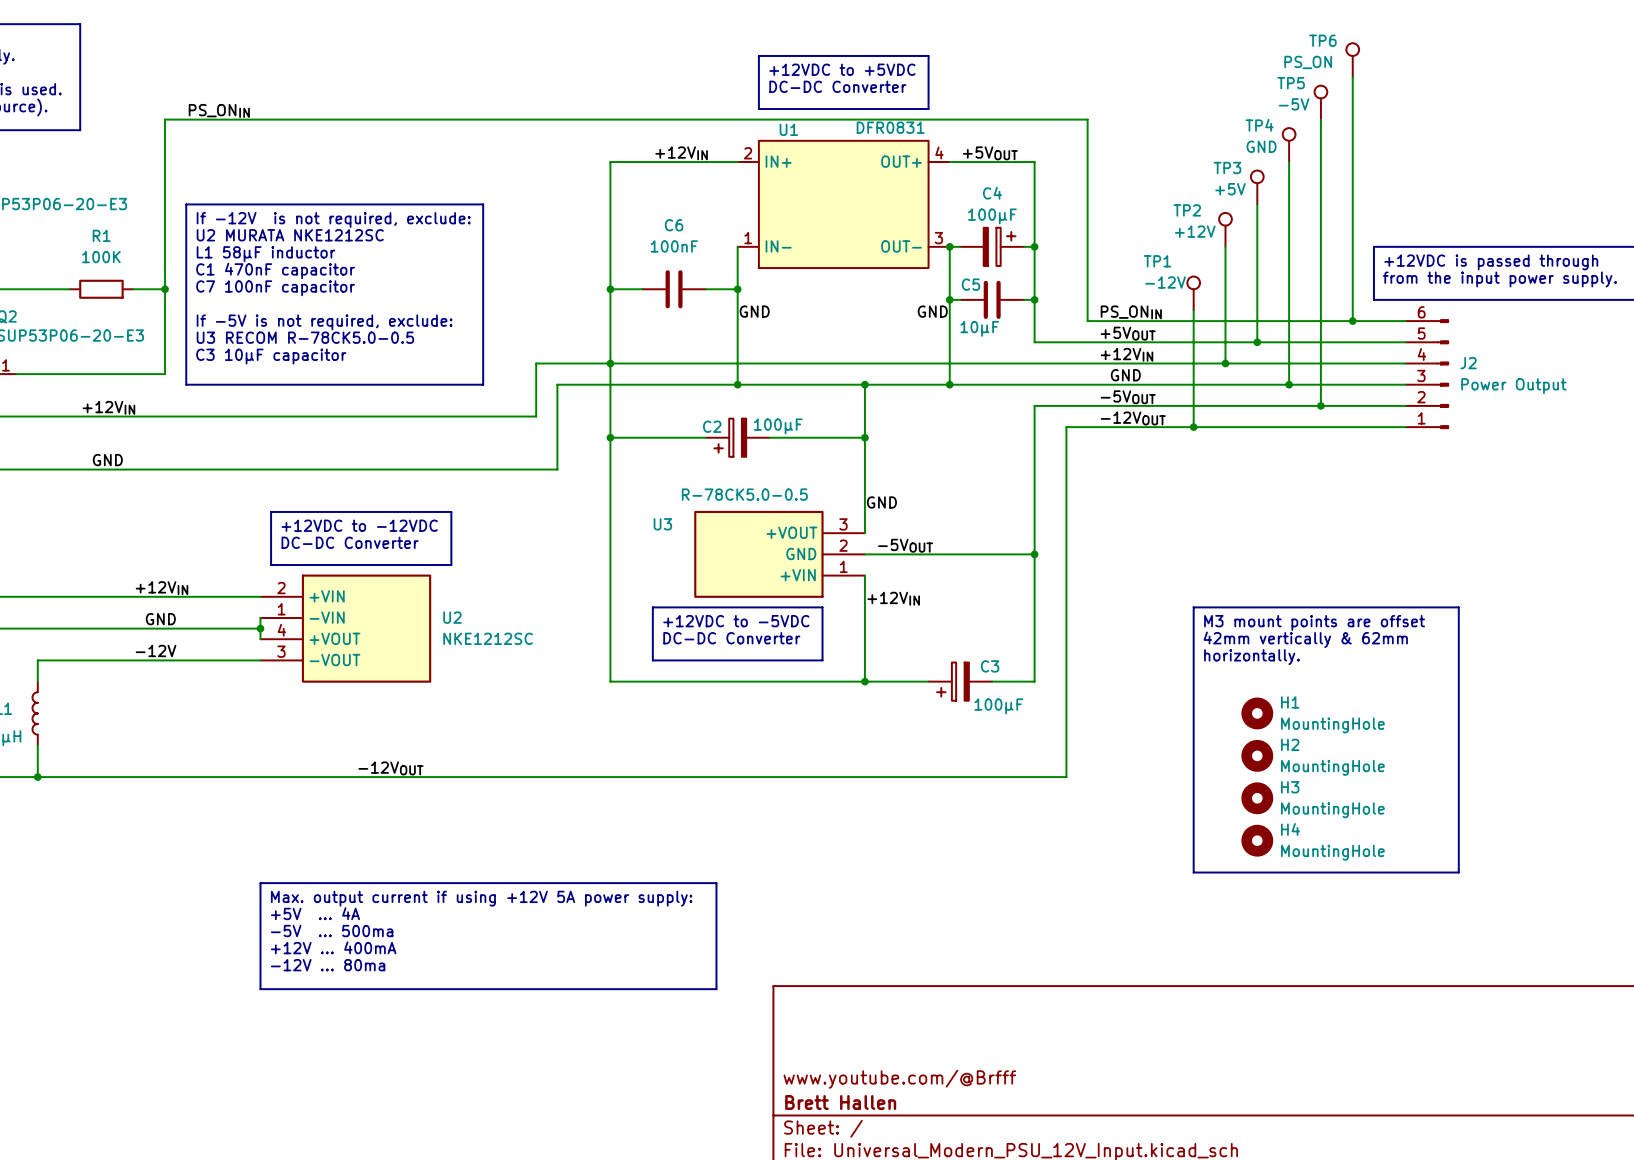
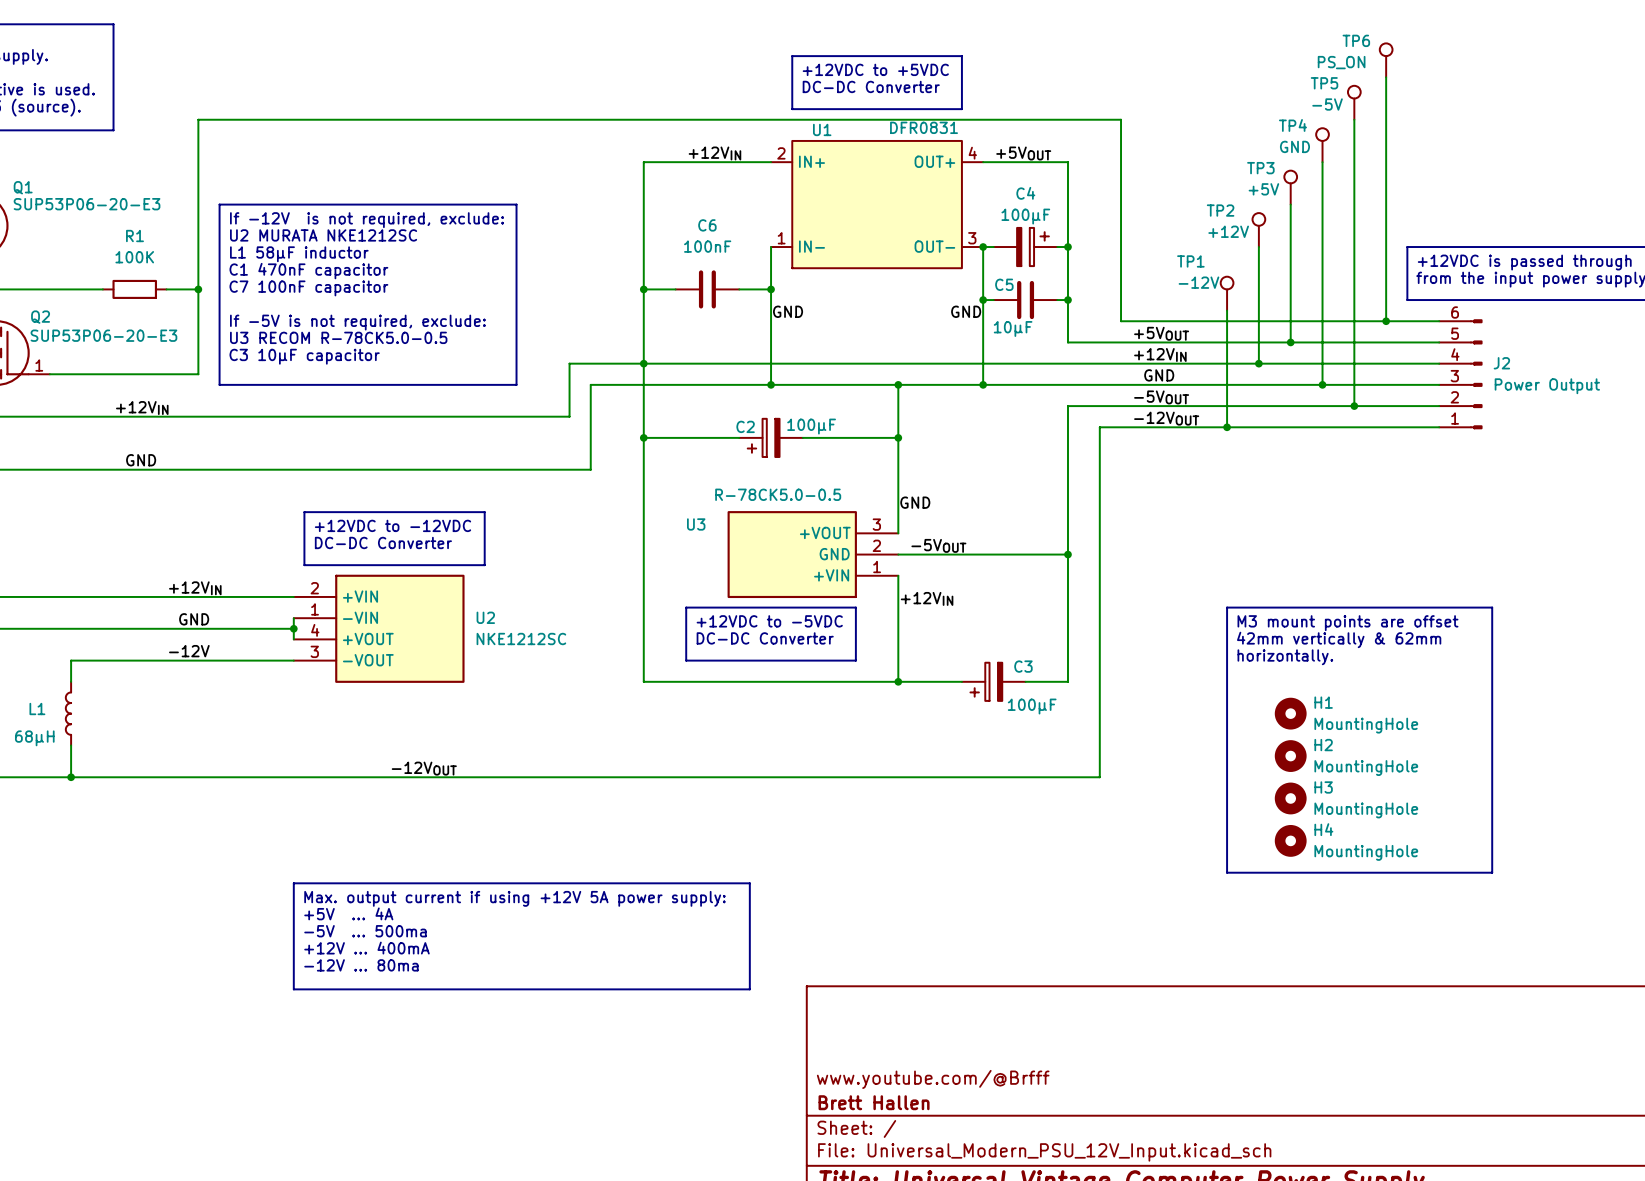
label: PS_ONIN (219, 110) -> none
label: PS_ONIN (1131, 312) -> none

